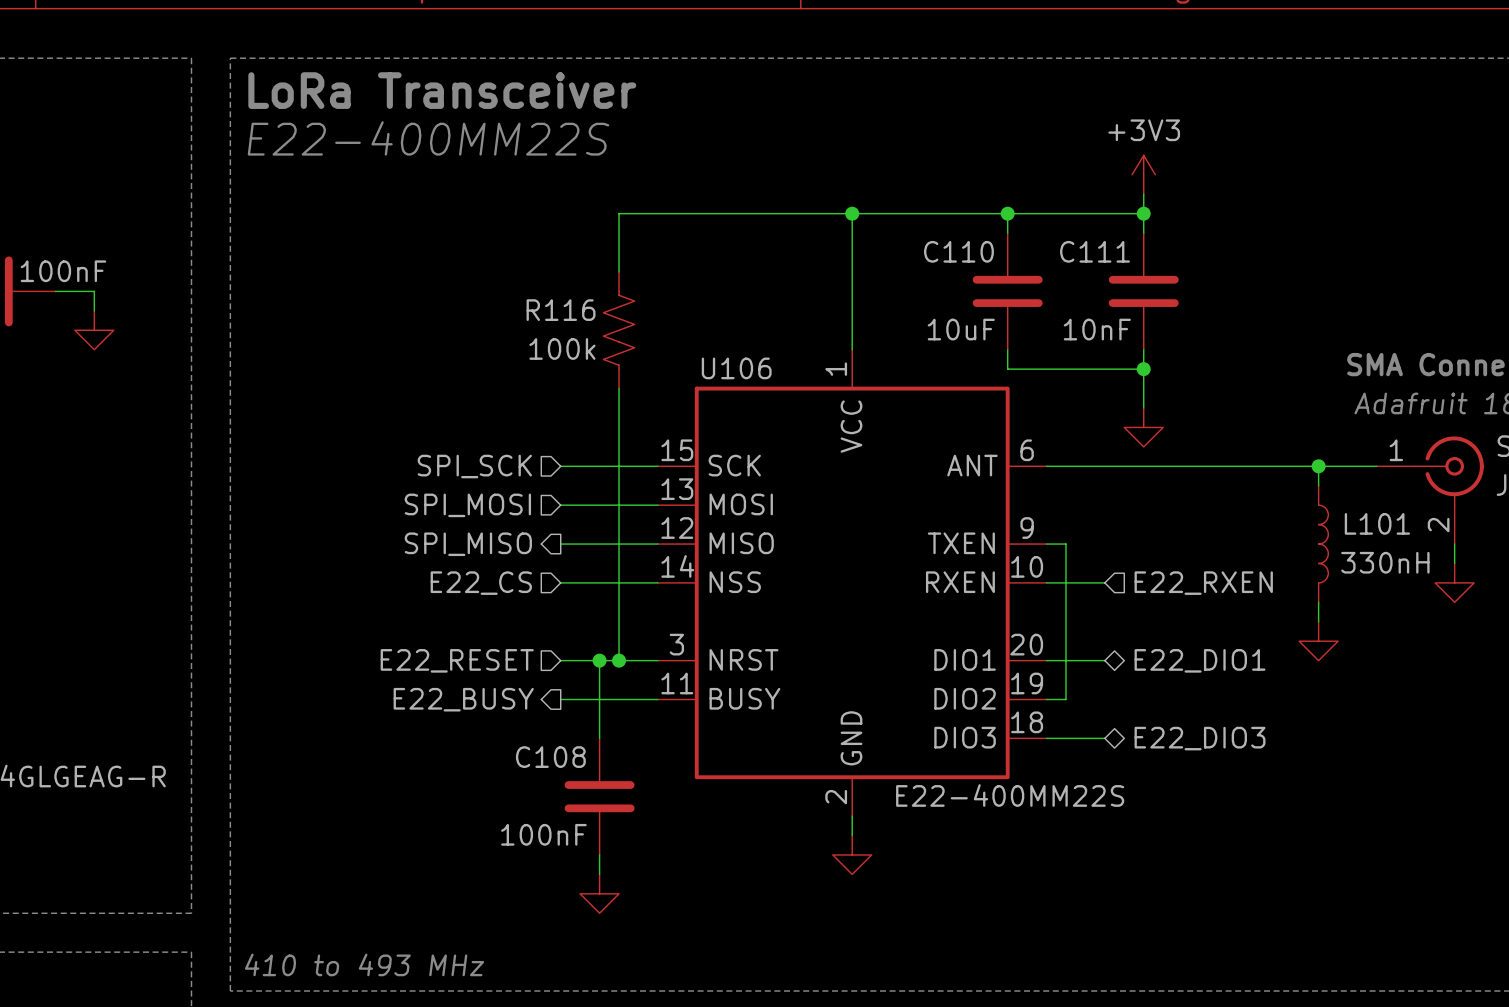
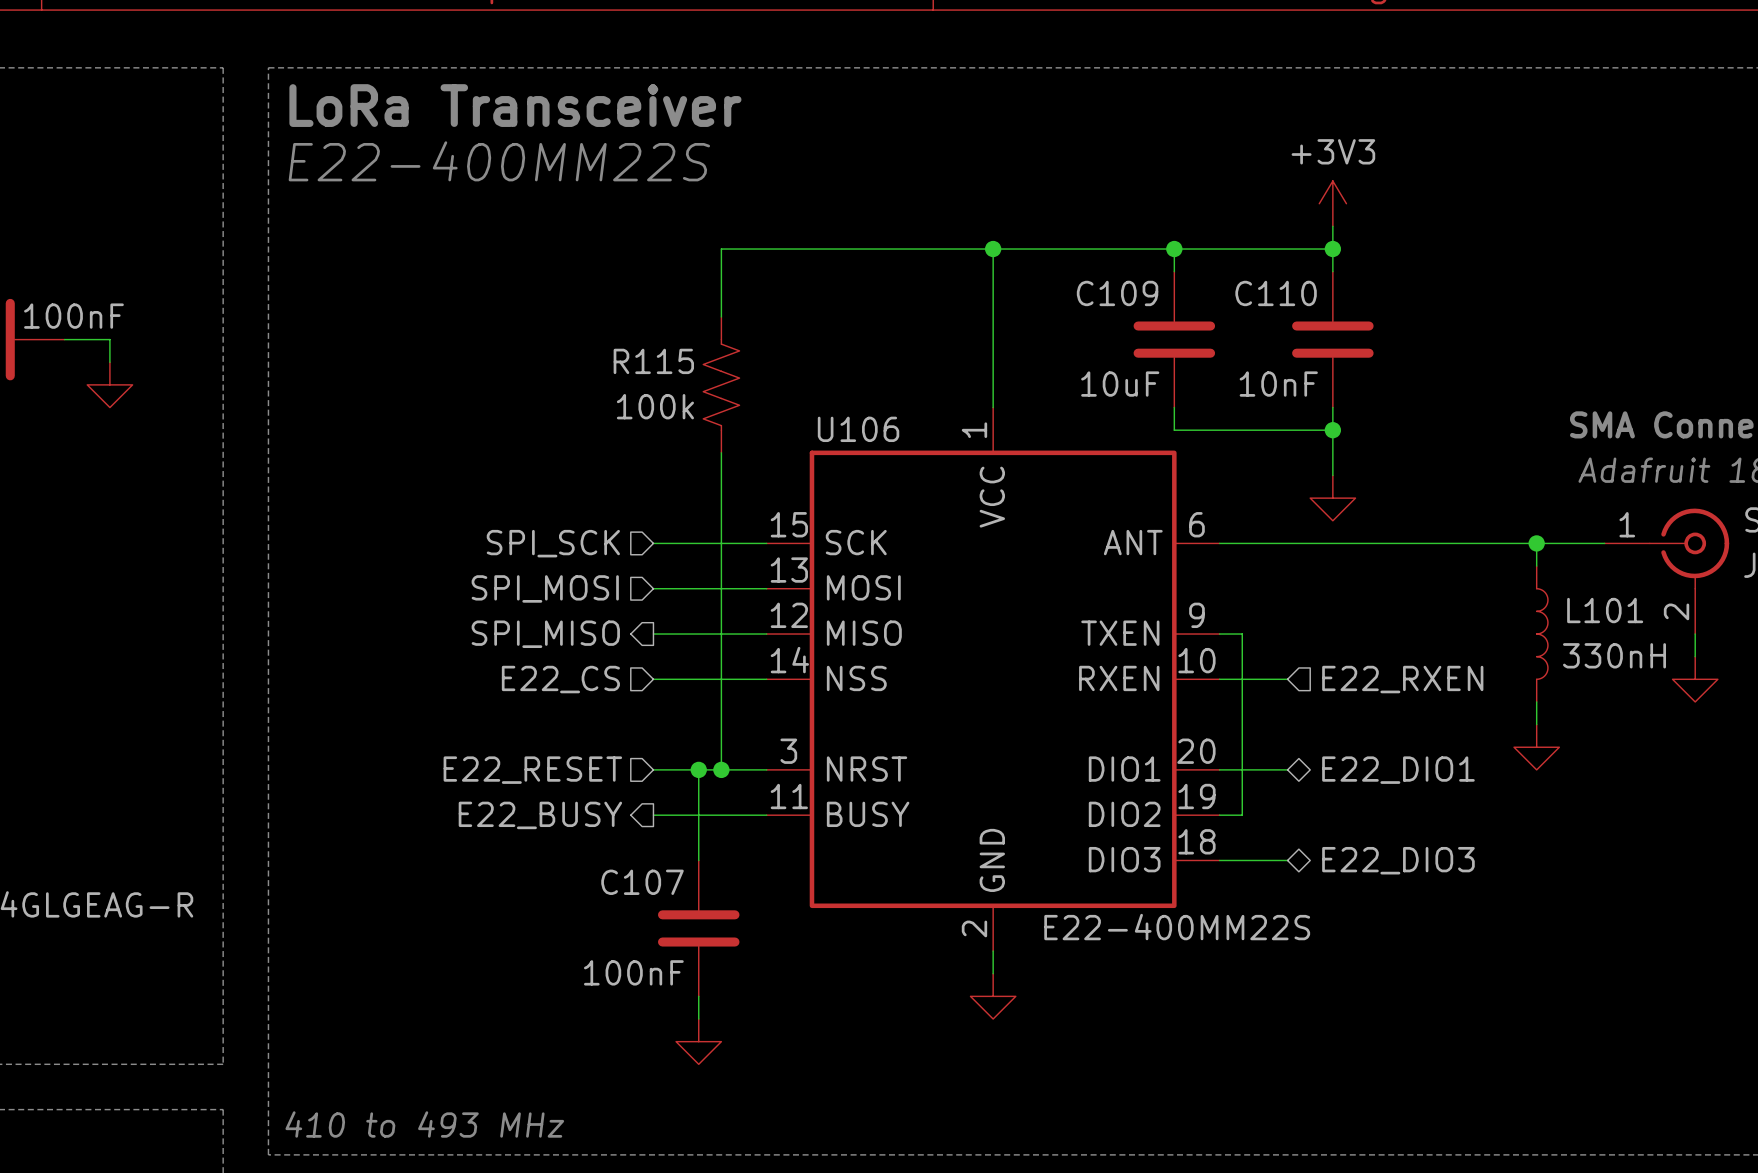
C110 name: C110 (958, 251) -> C109 (1117, 293)
C111 name: C111 (1094, 251) -> C110 (1276, 293)
R116 name: R116 (561, 310) -> R115 (653, 361)
C108 name: C108 (550, 757) -> C107 (642, 882)

